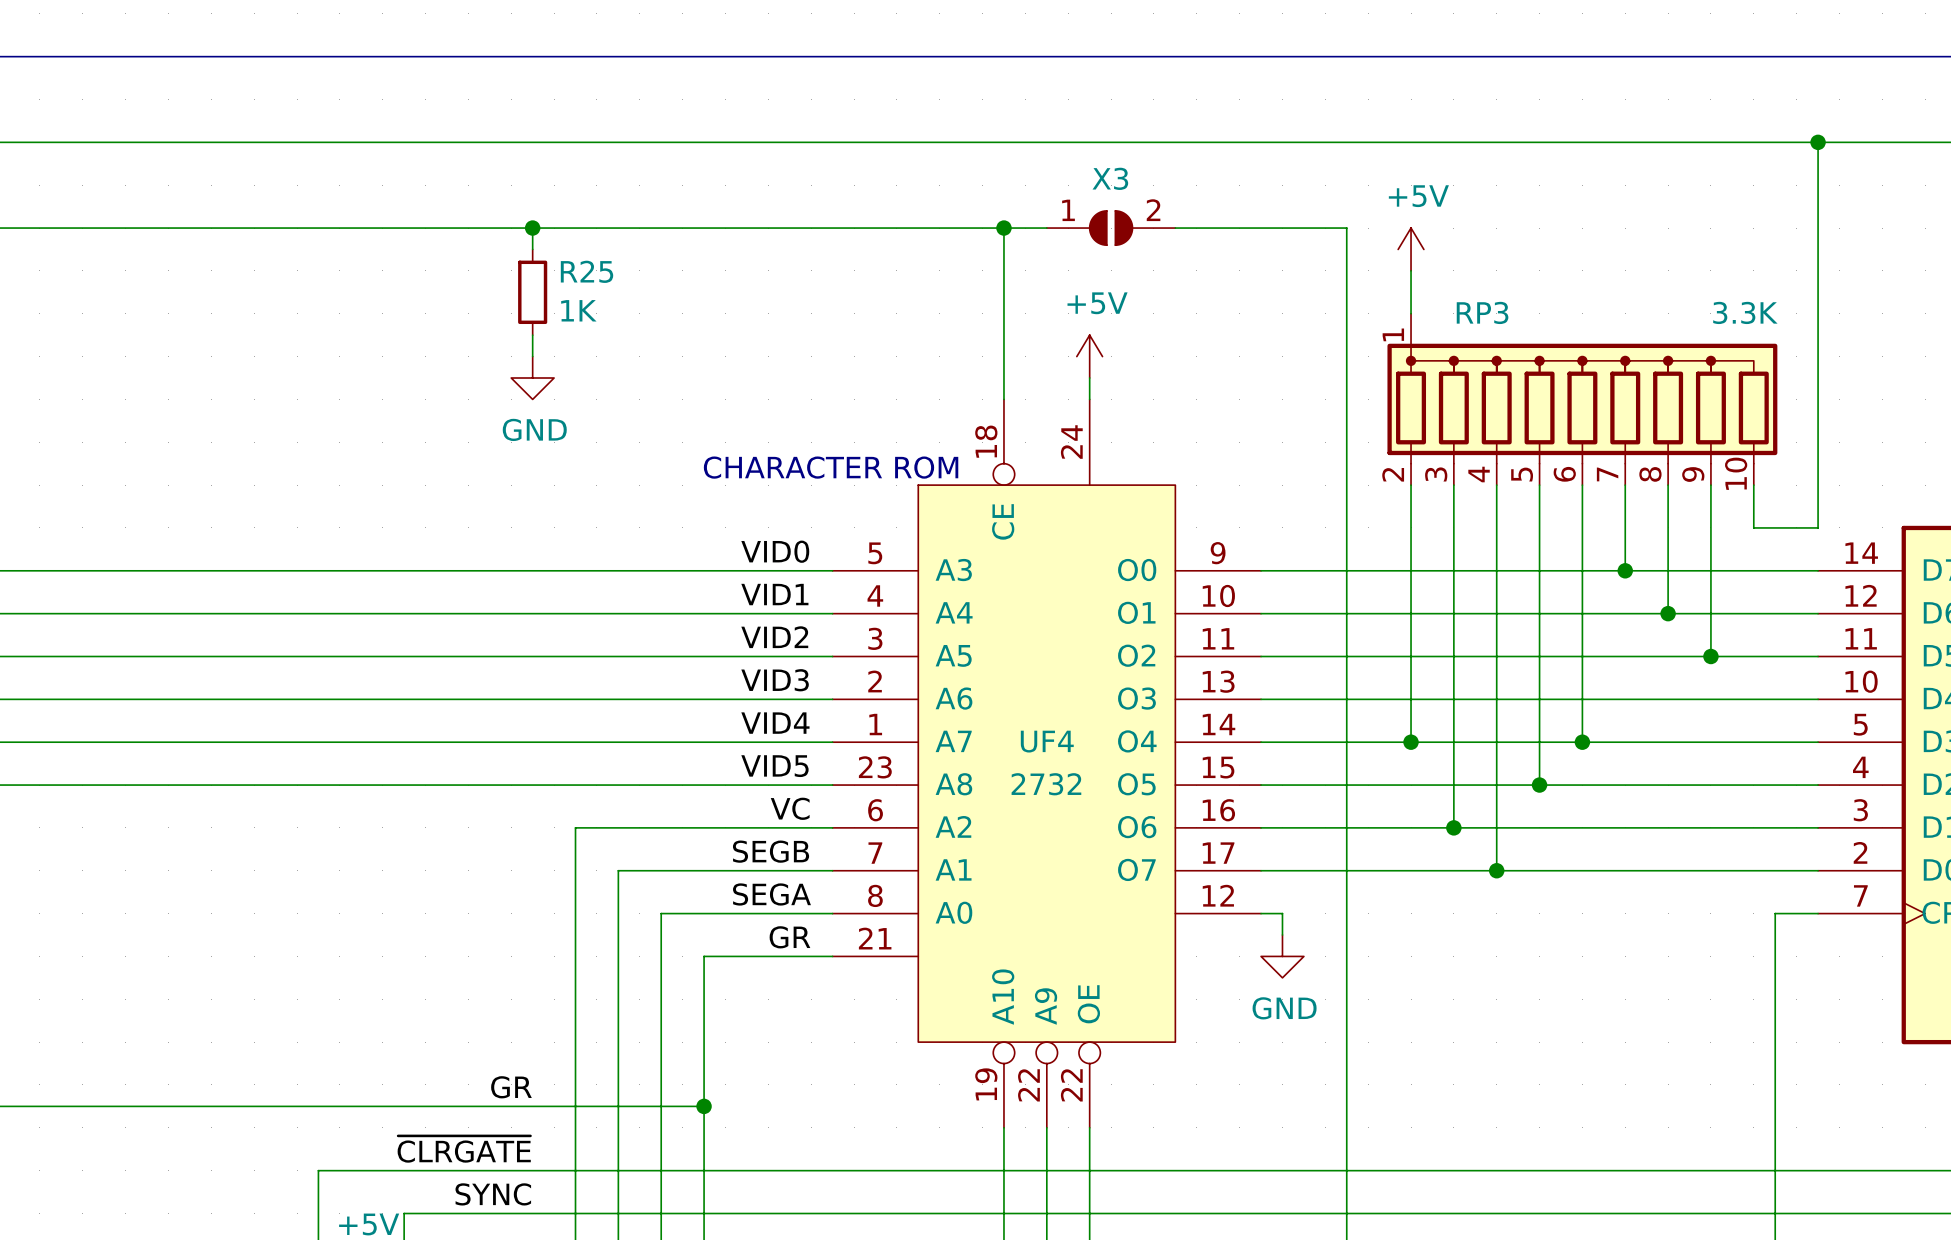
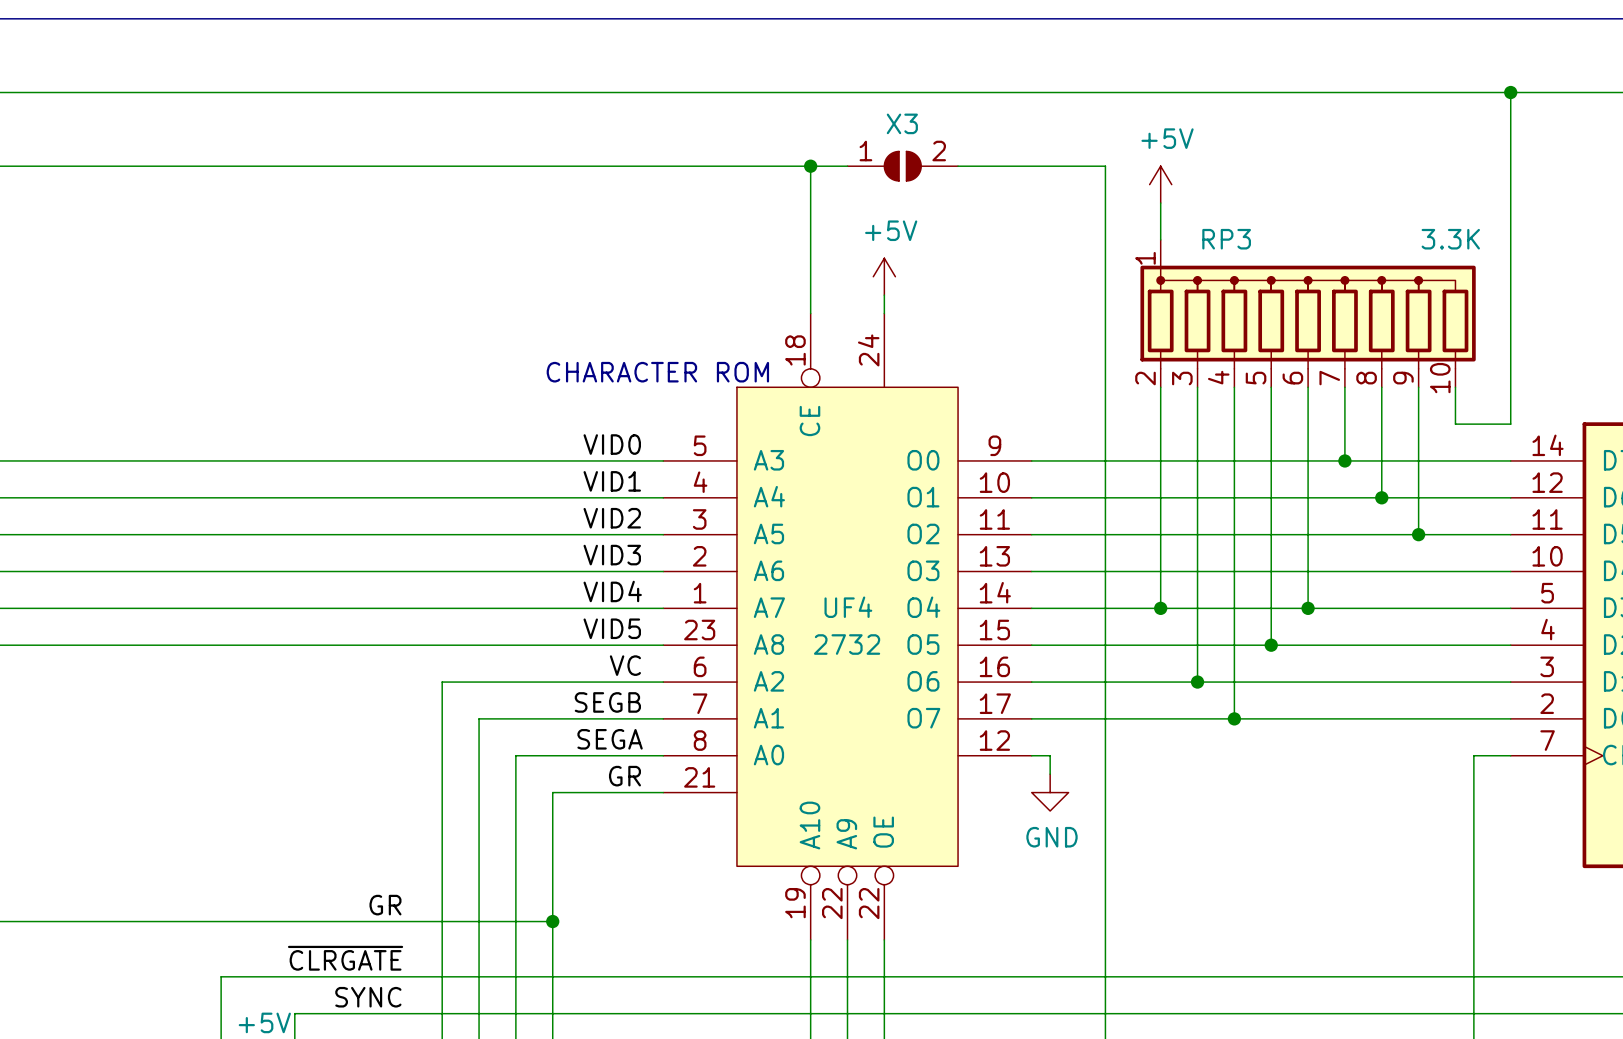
wire: (532, 228) (532, 249) -> none
junction: (532, 228) -> none
R25: 1K (532, 292) -> none
wire: (532, 335) (532, 356) -> none
power symbol: GND (532, 378) -> none

